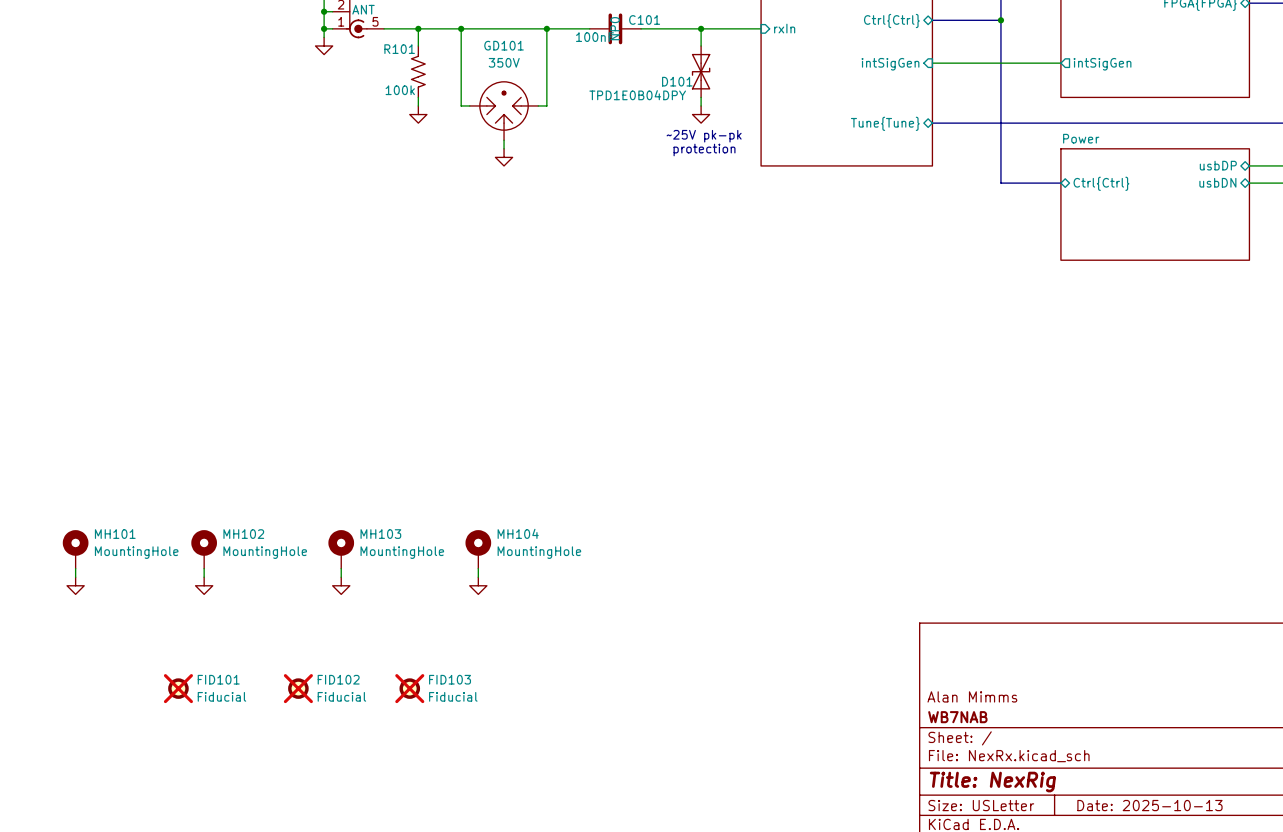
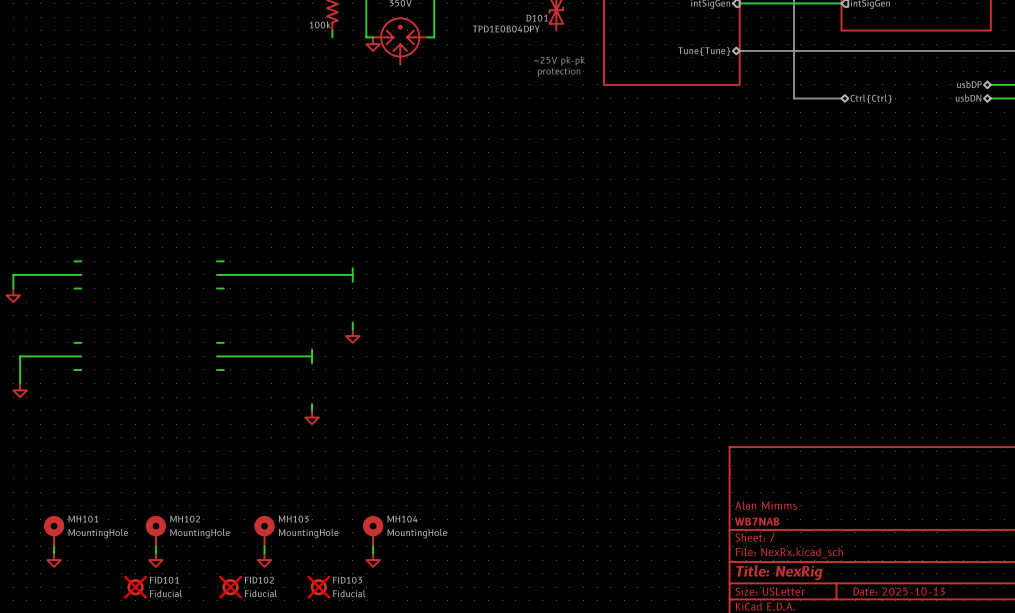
wire: (701, 97) (701, 105) -> none
power symbol: (418, 114) -> none
power symbol: none -> (373, 44)
power symbol: (701, 114) -> none
wire: (504, 140) (504, 148) -> none
power symbol: (504, 157) -> none
sheet Power: (1155, 204) -> none
wire: none -> (74, 261) (81, 261)
wire: none -> (217, 261) (223, 261)
wire: none -> (352, 268) (352, 281)
wire: none -> (81, 274) (13, 274) (13, 288)
wire: none -> (217, 274) (352, 274)
wire: none -> (74, 288) (81, 288)
wire: none -> (217, 288) (223, 288)
power symbol: none -> (13, 295)
power symbol: none -> (352, 336)
wire: none -> (74, 342) (81, 342)
wire: none -> (217, 342) (223, 342)
wire: none -> (312, 349) (312, 363)
wire: none -> (81, 356) (20, 356) (20, 383)
wire: none -> (217, 356) (312, 356)
wire: none -> (74, 369) (81, 369)
wire: none -> (217, 369) (223, 369)
MH101 position: (75, 549) -> (54, 531)
MH102 position: (204, 549) -> (155, 531)
MH103 position: (341, 549) -> (264, 531)
MH104 position: (478, 549) -> (373, 531)
wire: (75, 568) (75, 577) -> none
wire: (204, 568) (204, 577) -> none
wire: (341, 568) (341, 577) -> (312, 403) (312, 410)
wire: (478, 568) (478, 577) -> (352, 322) (352, 329)
power symbol position: (75, 585) -> (20, 390)
power symbol: (204, 585) -> none
power symbol: (341, 585) -> none
power symbol: none -> (312, 417)
power symbol: (478, 585) -> none
FID101 position: (178, 688) -> (135, 587)
FID102 position: (298, 688) -> (230, 587)
FID103 position: (409, 688) -> (318, 587)
wire: none -> (54, 546) (54, 553)
wire: none -> (155, 546) (155, 553)
wire: none -> (264, 546) (264, 553)
wire: none -> (373, 546) (373, 553)
power symbol: none -> (54, 560)
power symbol: none -> (155, 560)
power symbol: none -> (264, 560)
power symbol: none -> (373, 560)

